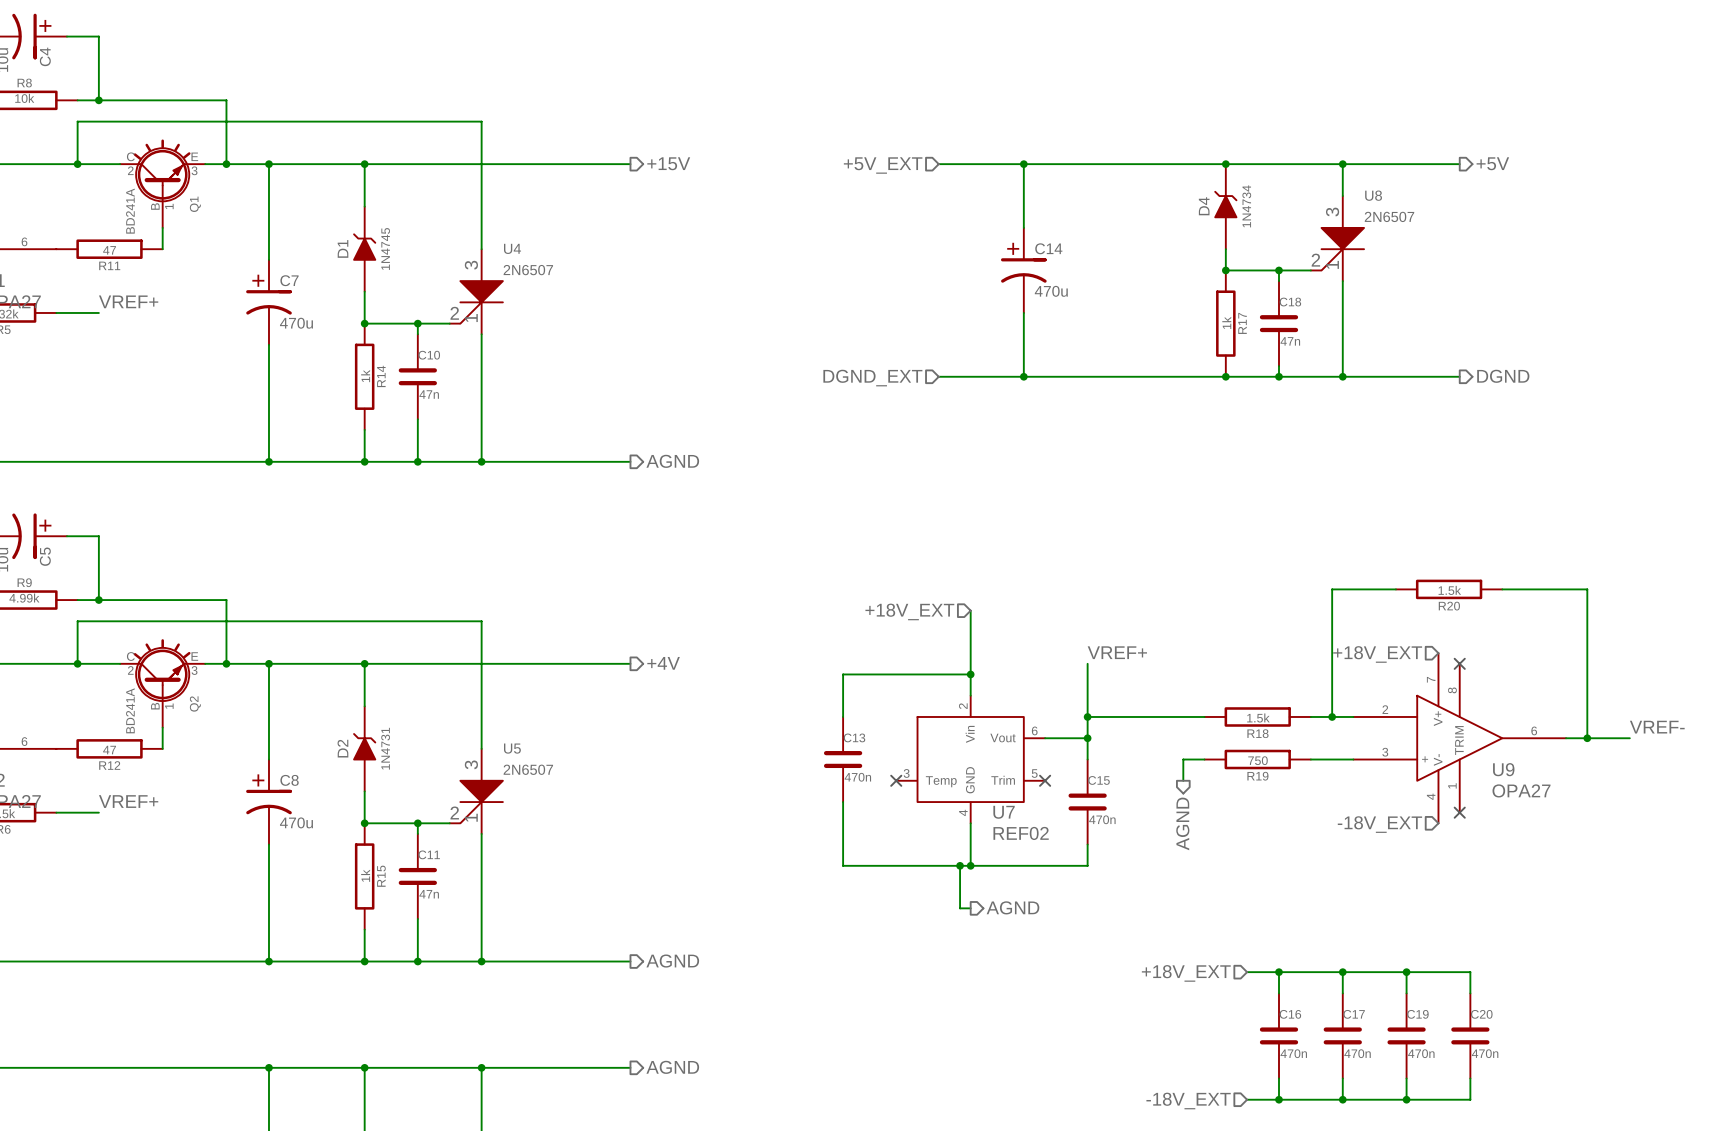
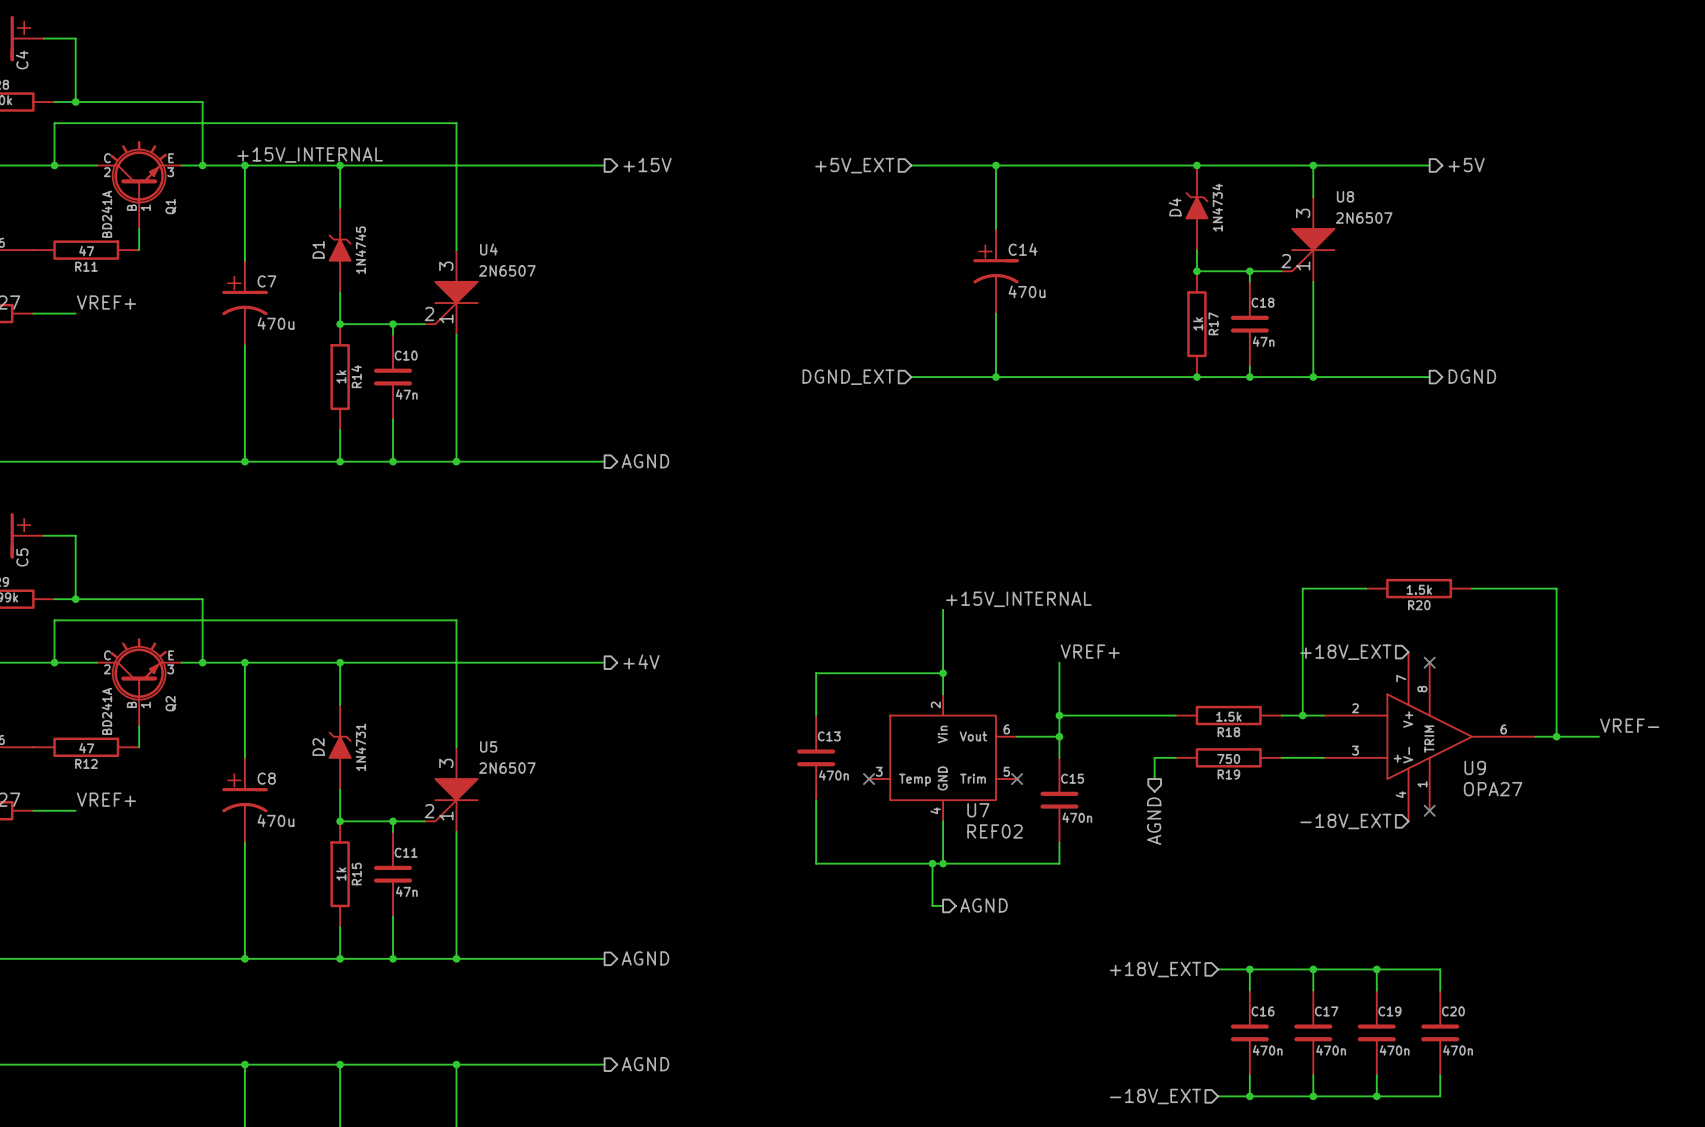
label: none -> +15V_INTERNAL (310, 155)
label: none -> +15V_INTERNAL (1018, 599)
hierarchical label: +18V_EXT (909, 611) -> none

